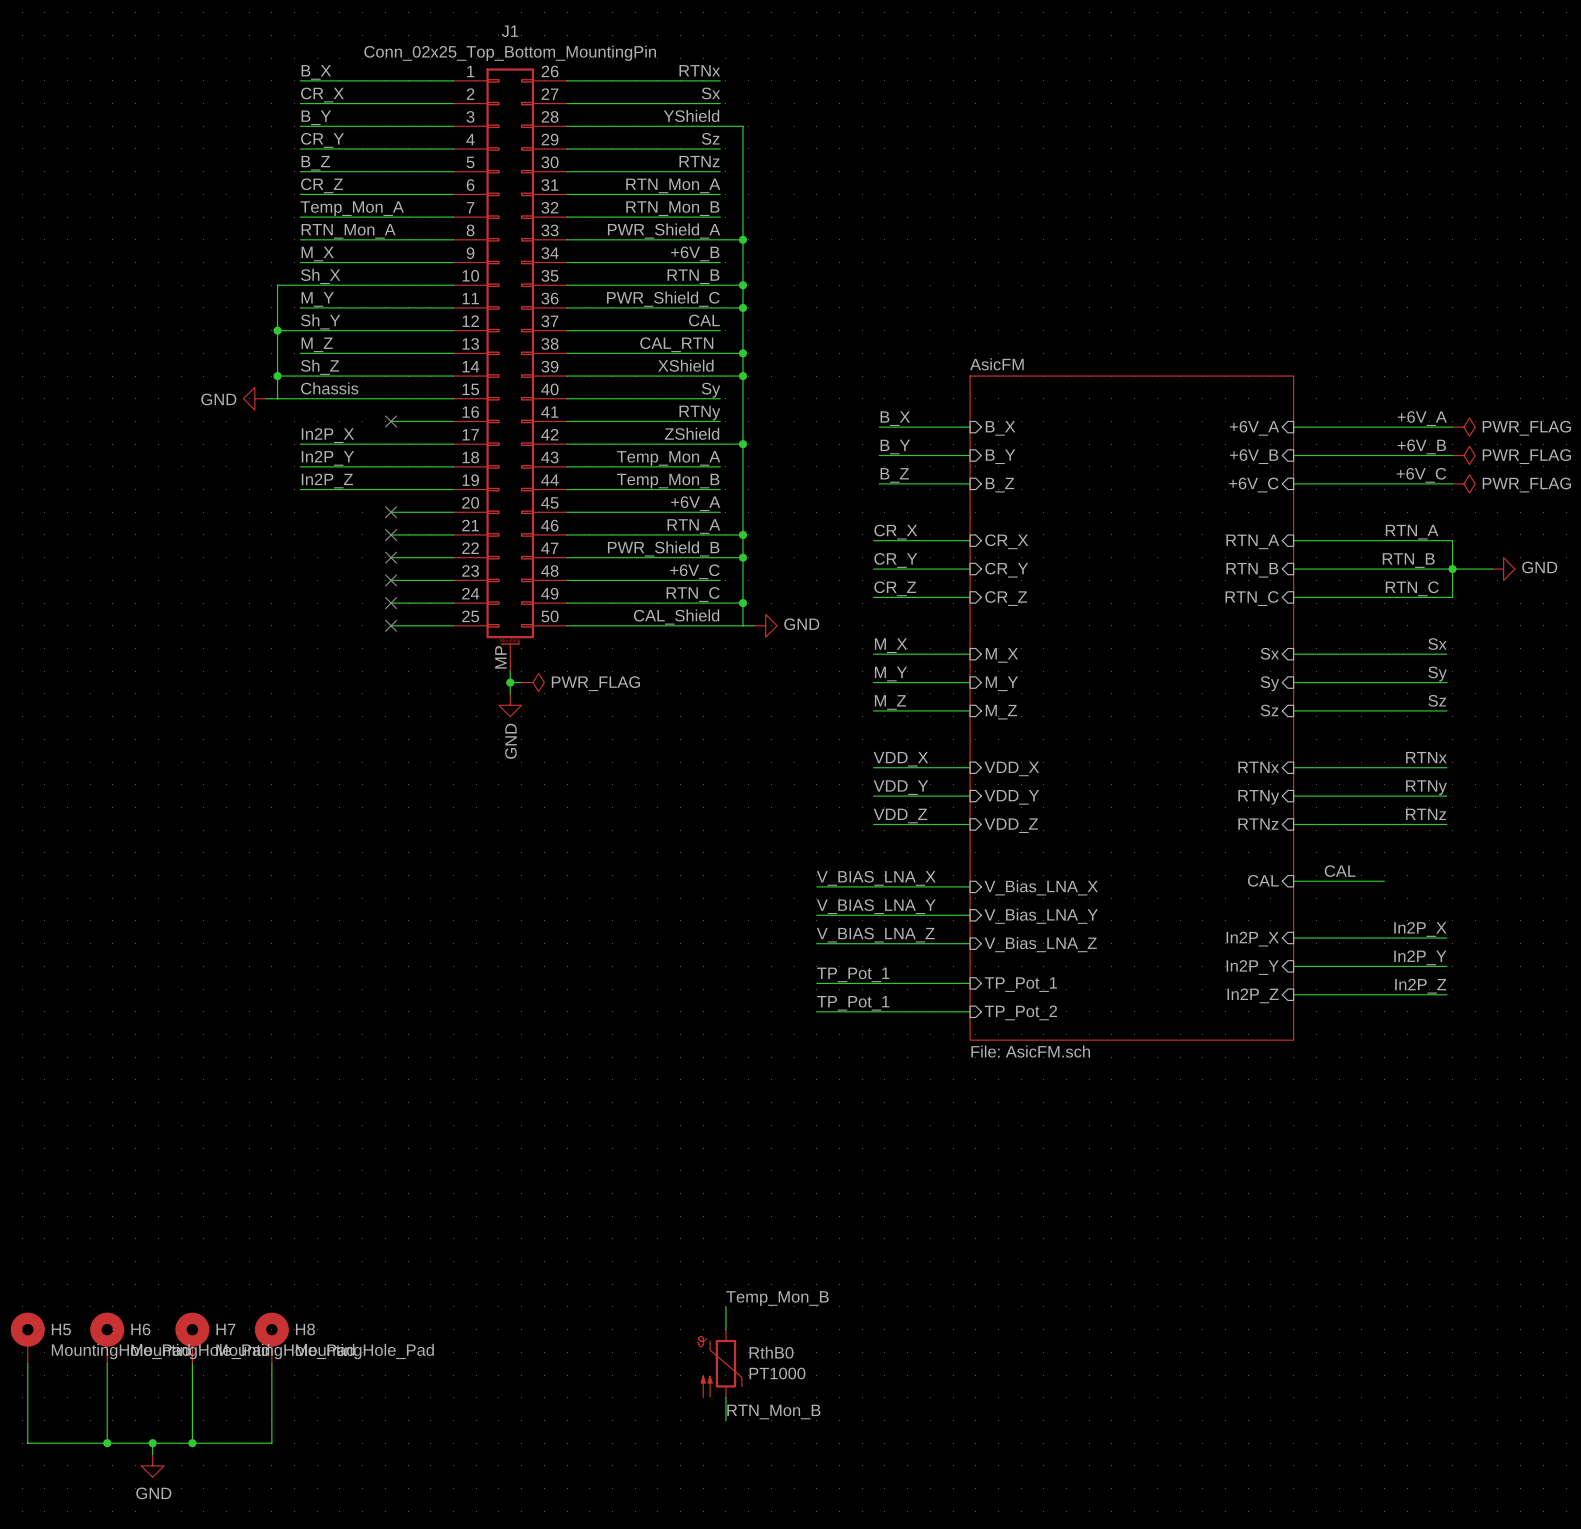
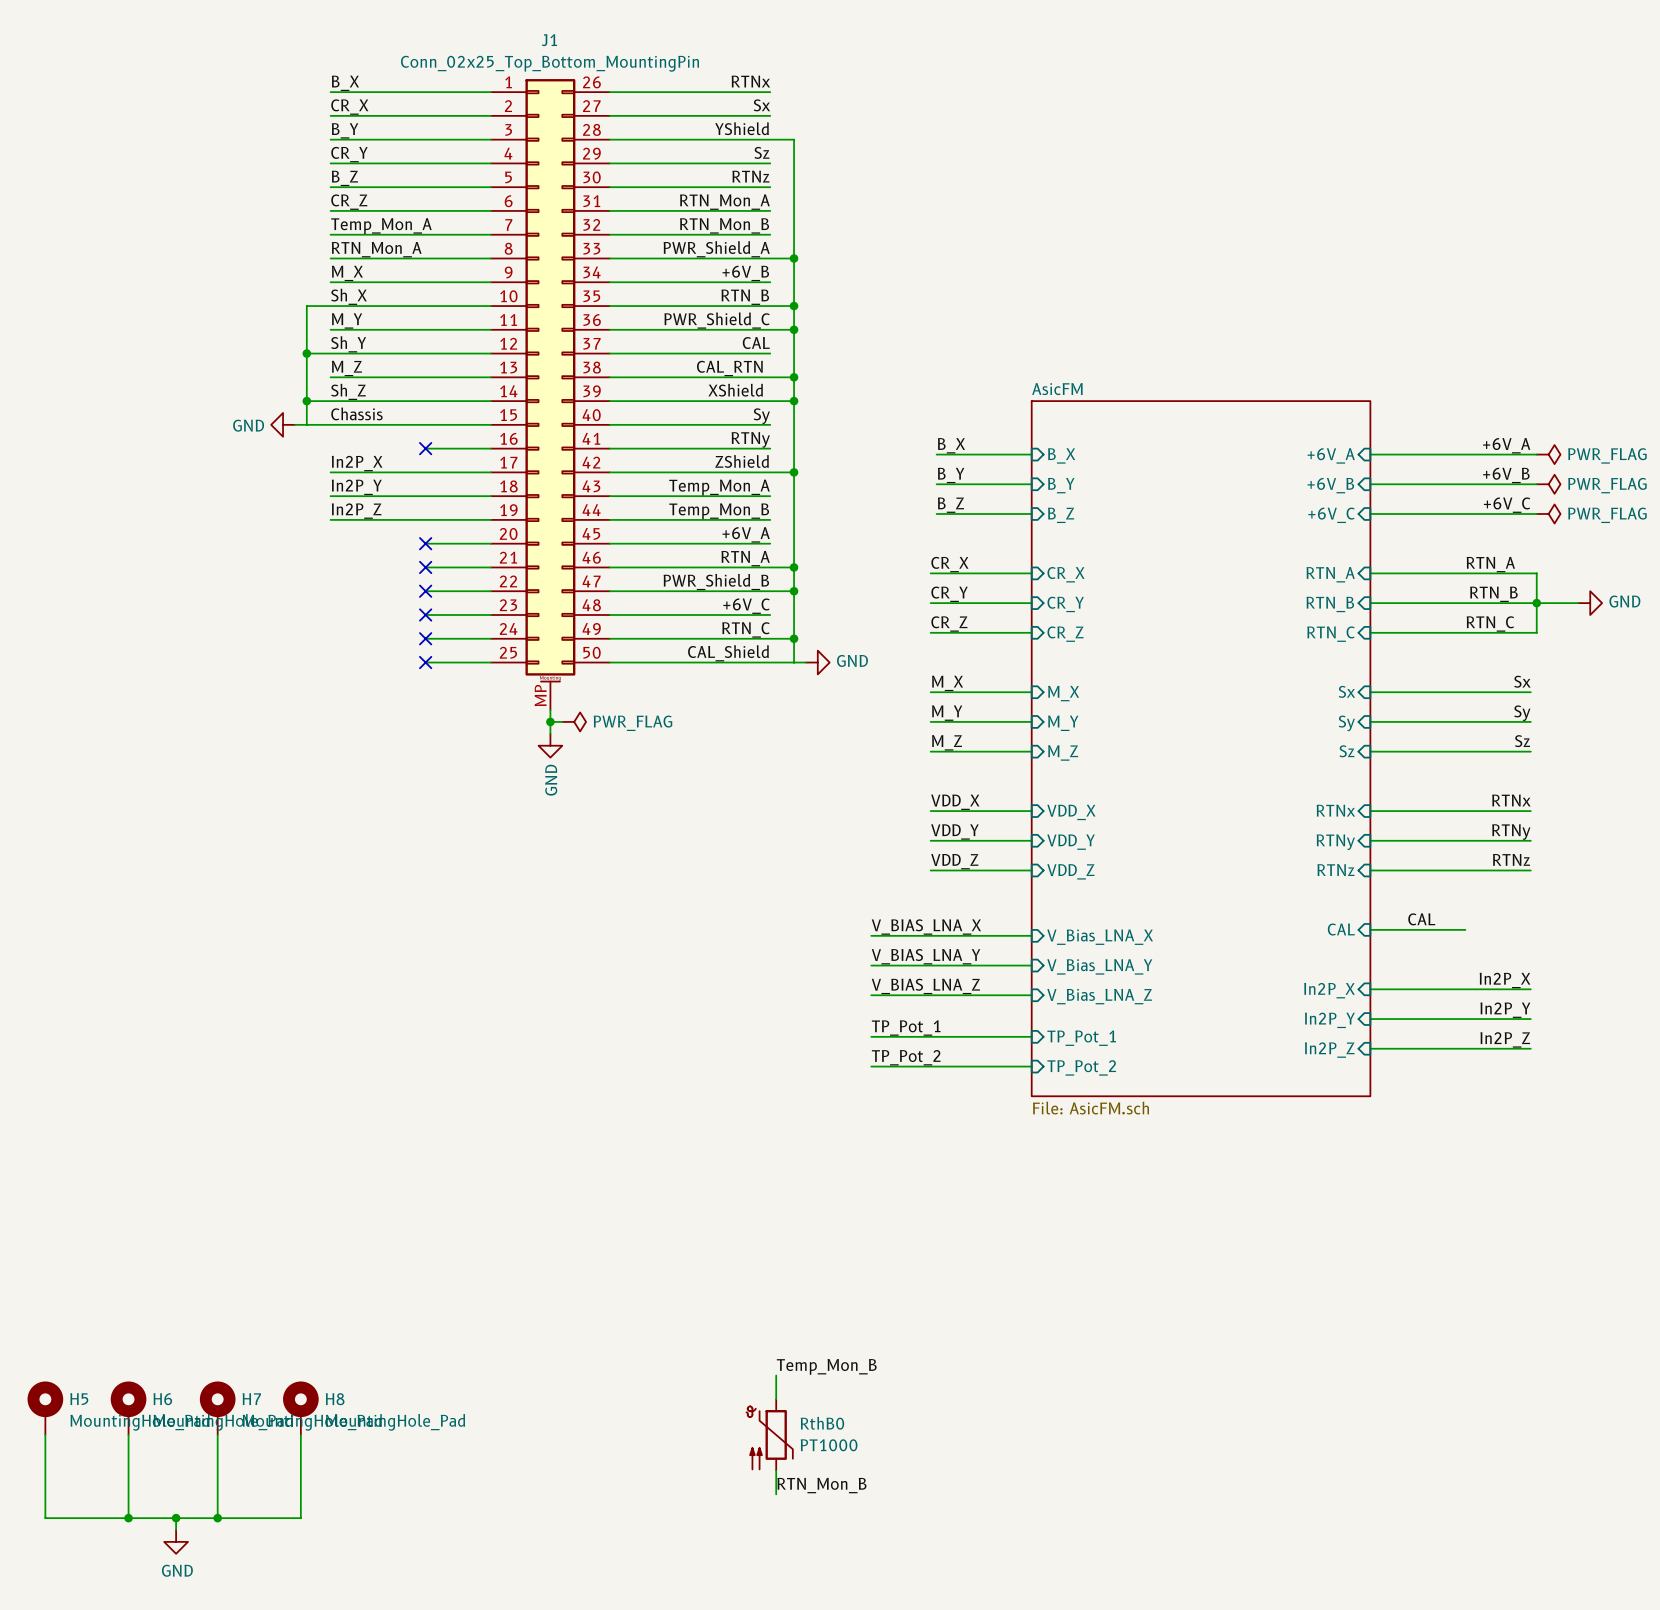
label: TP_Pot_1 (853, 1003) -> TP_Pot_2 (906, 1057)

